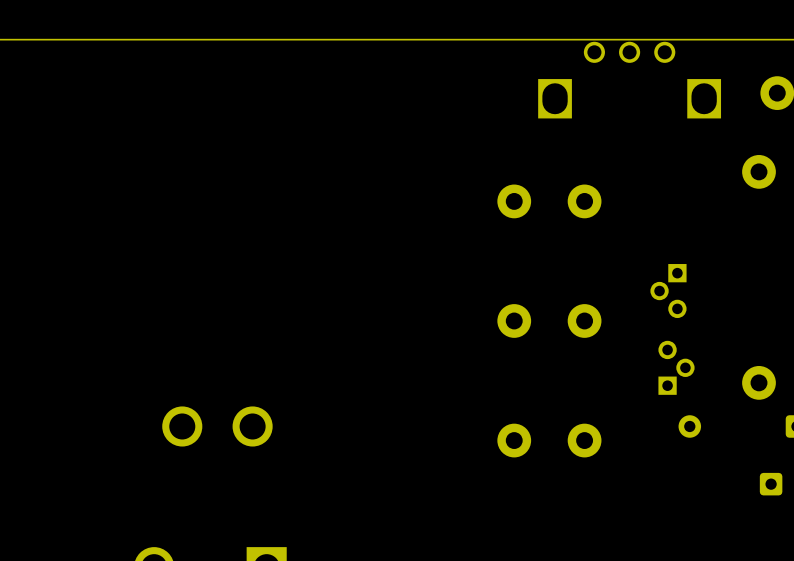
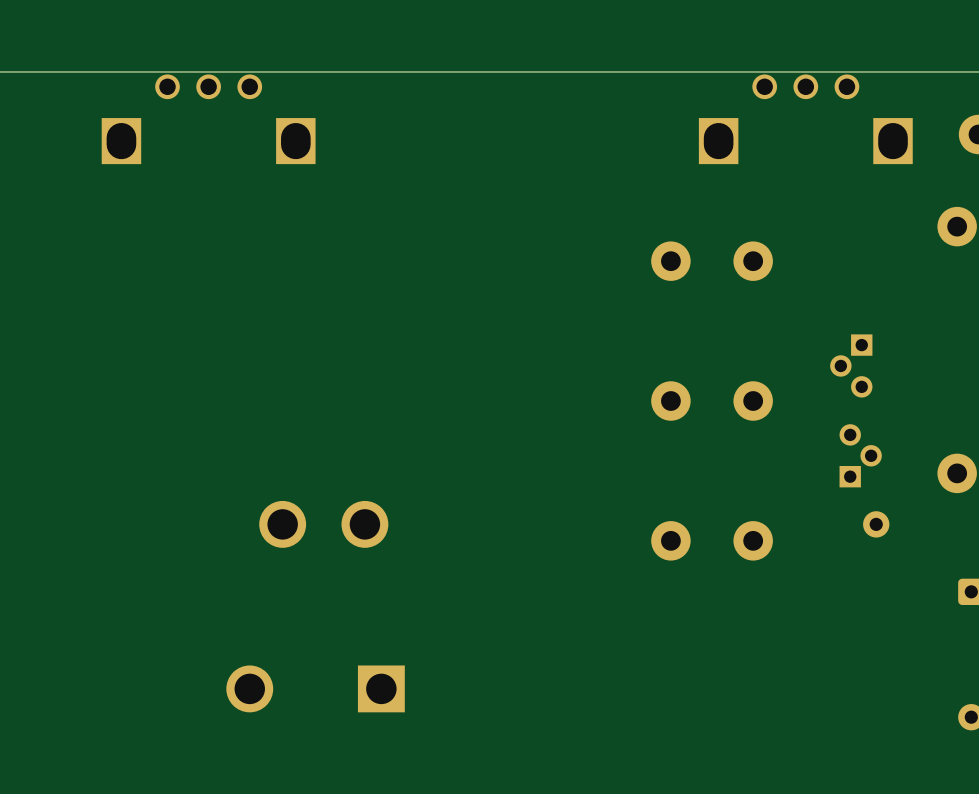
part: none -> (208, 119)

